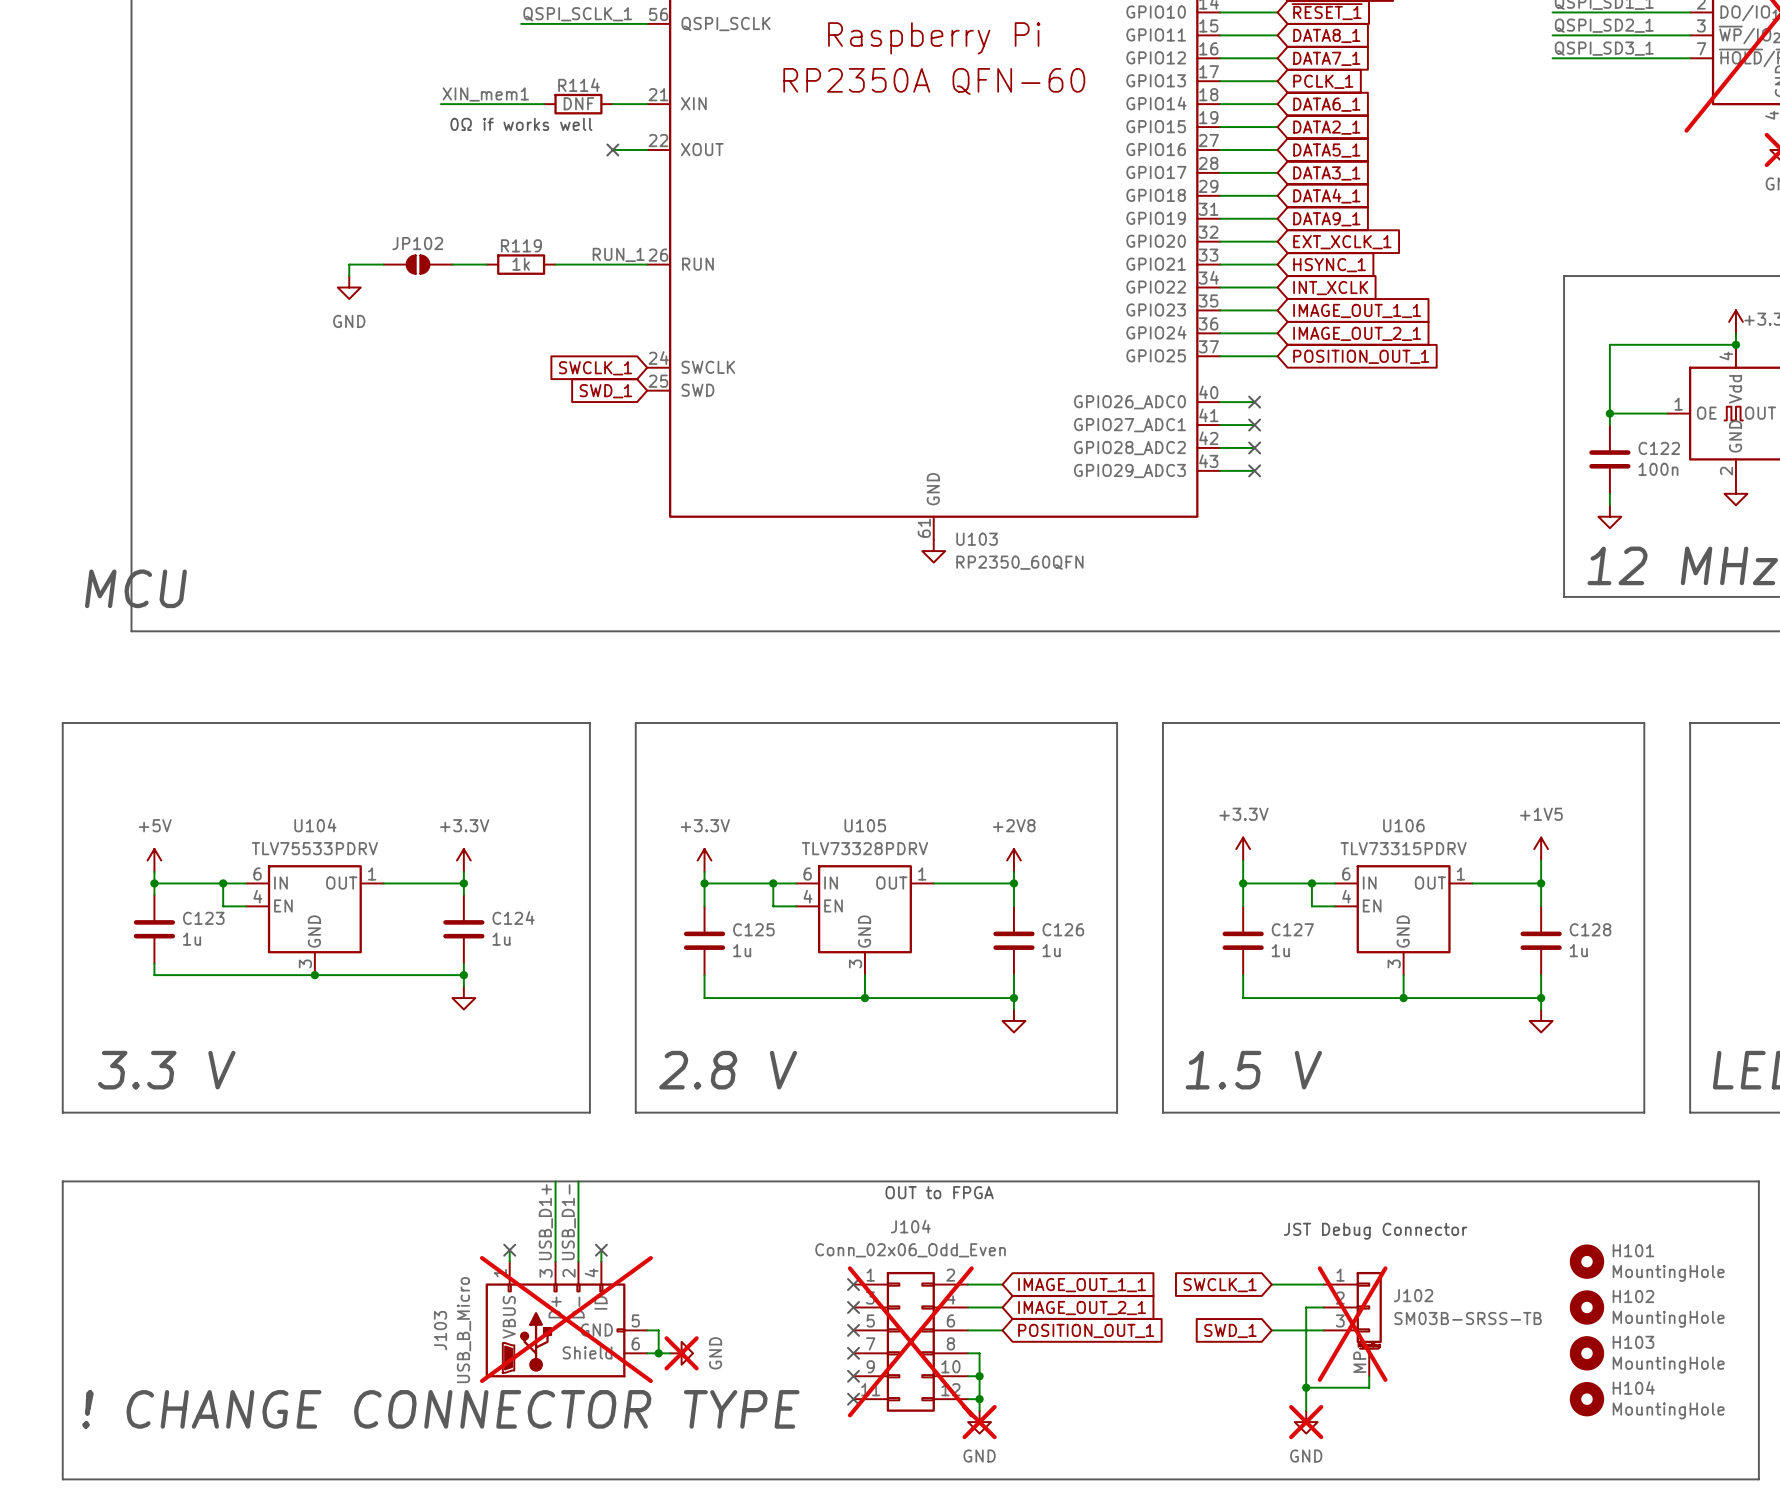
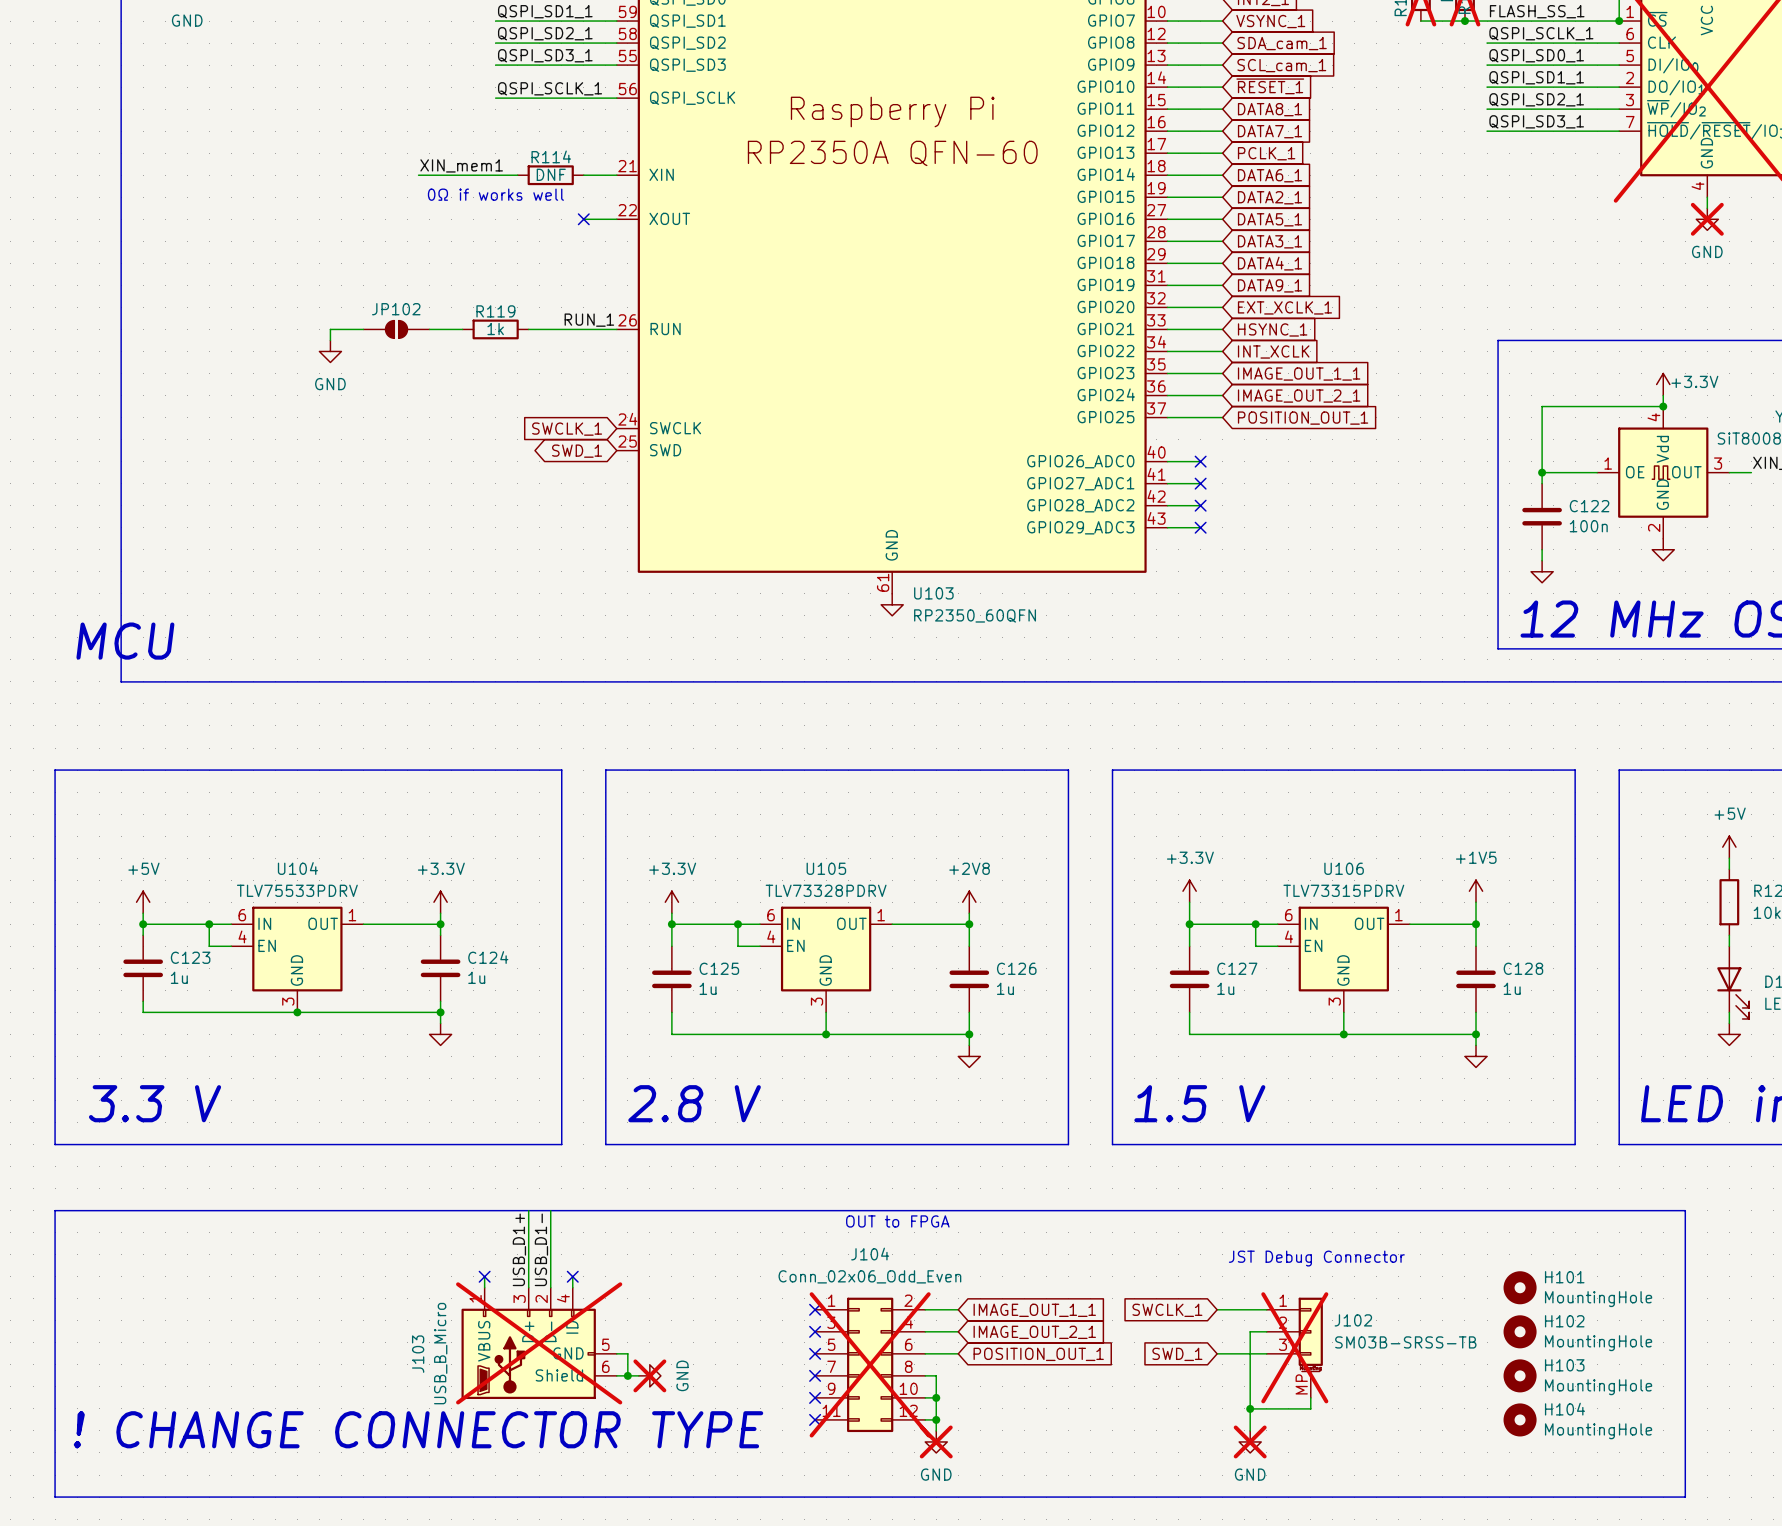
global label shape: input (605, 391) -> bidirectional (577, 451)

